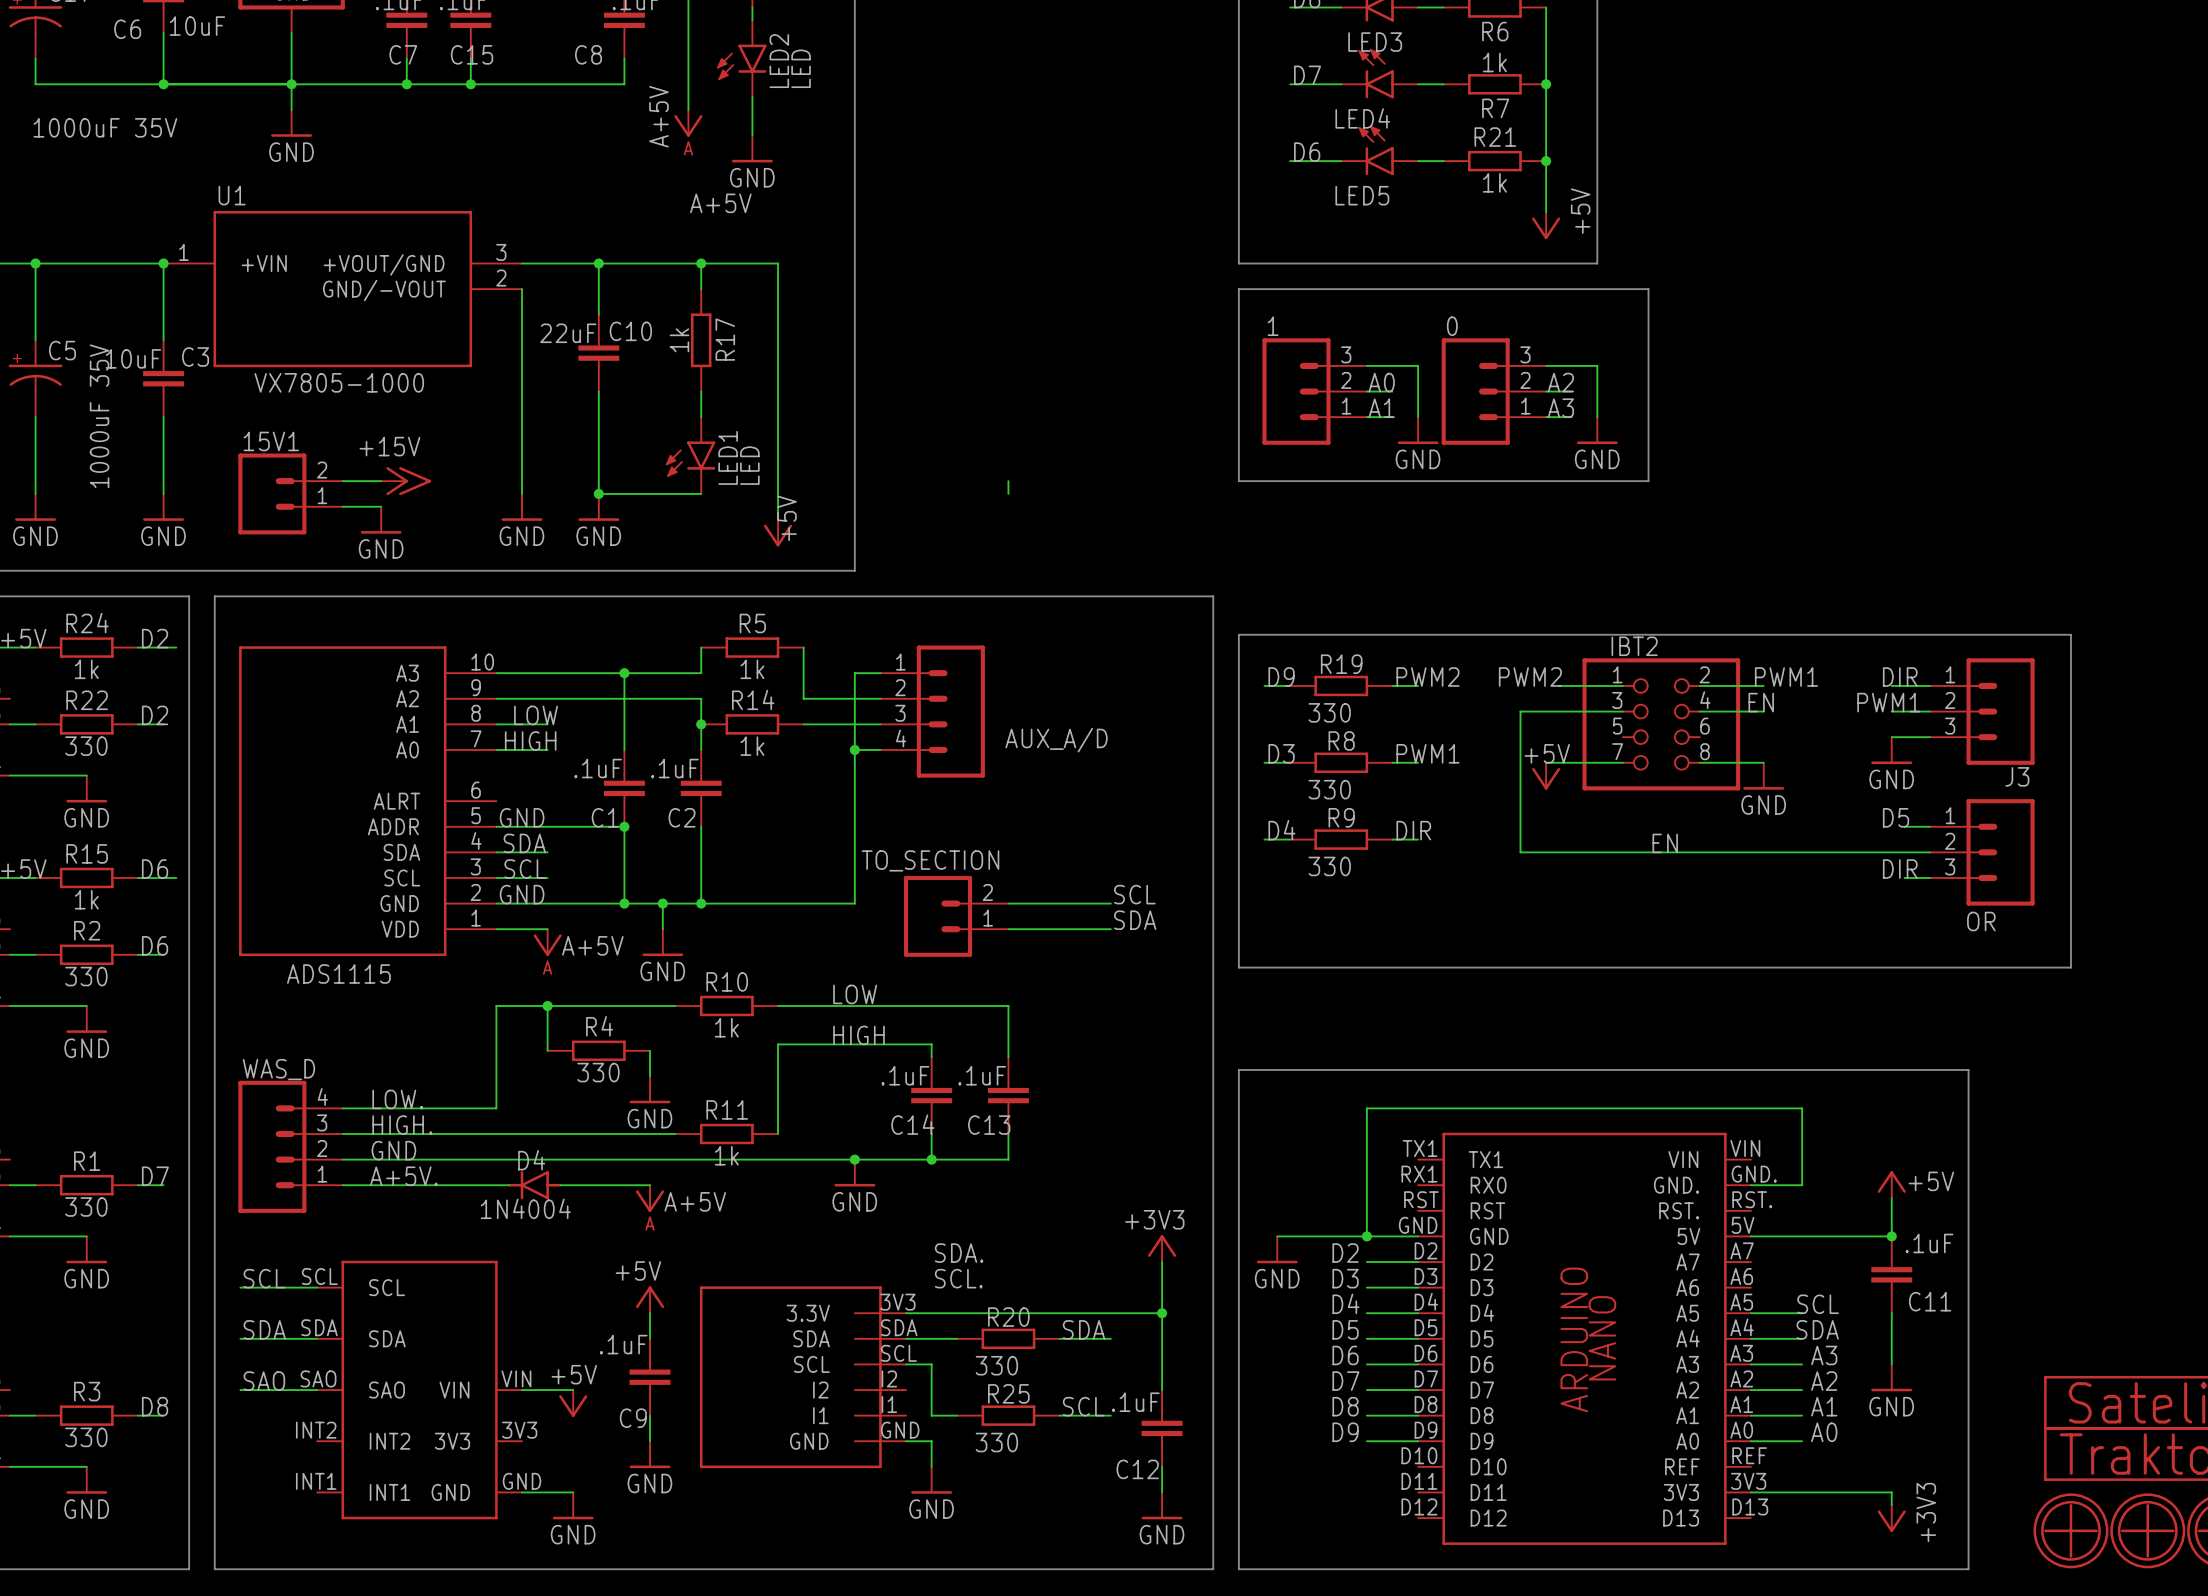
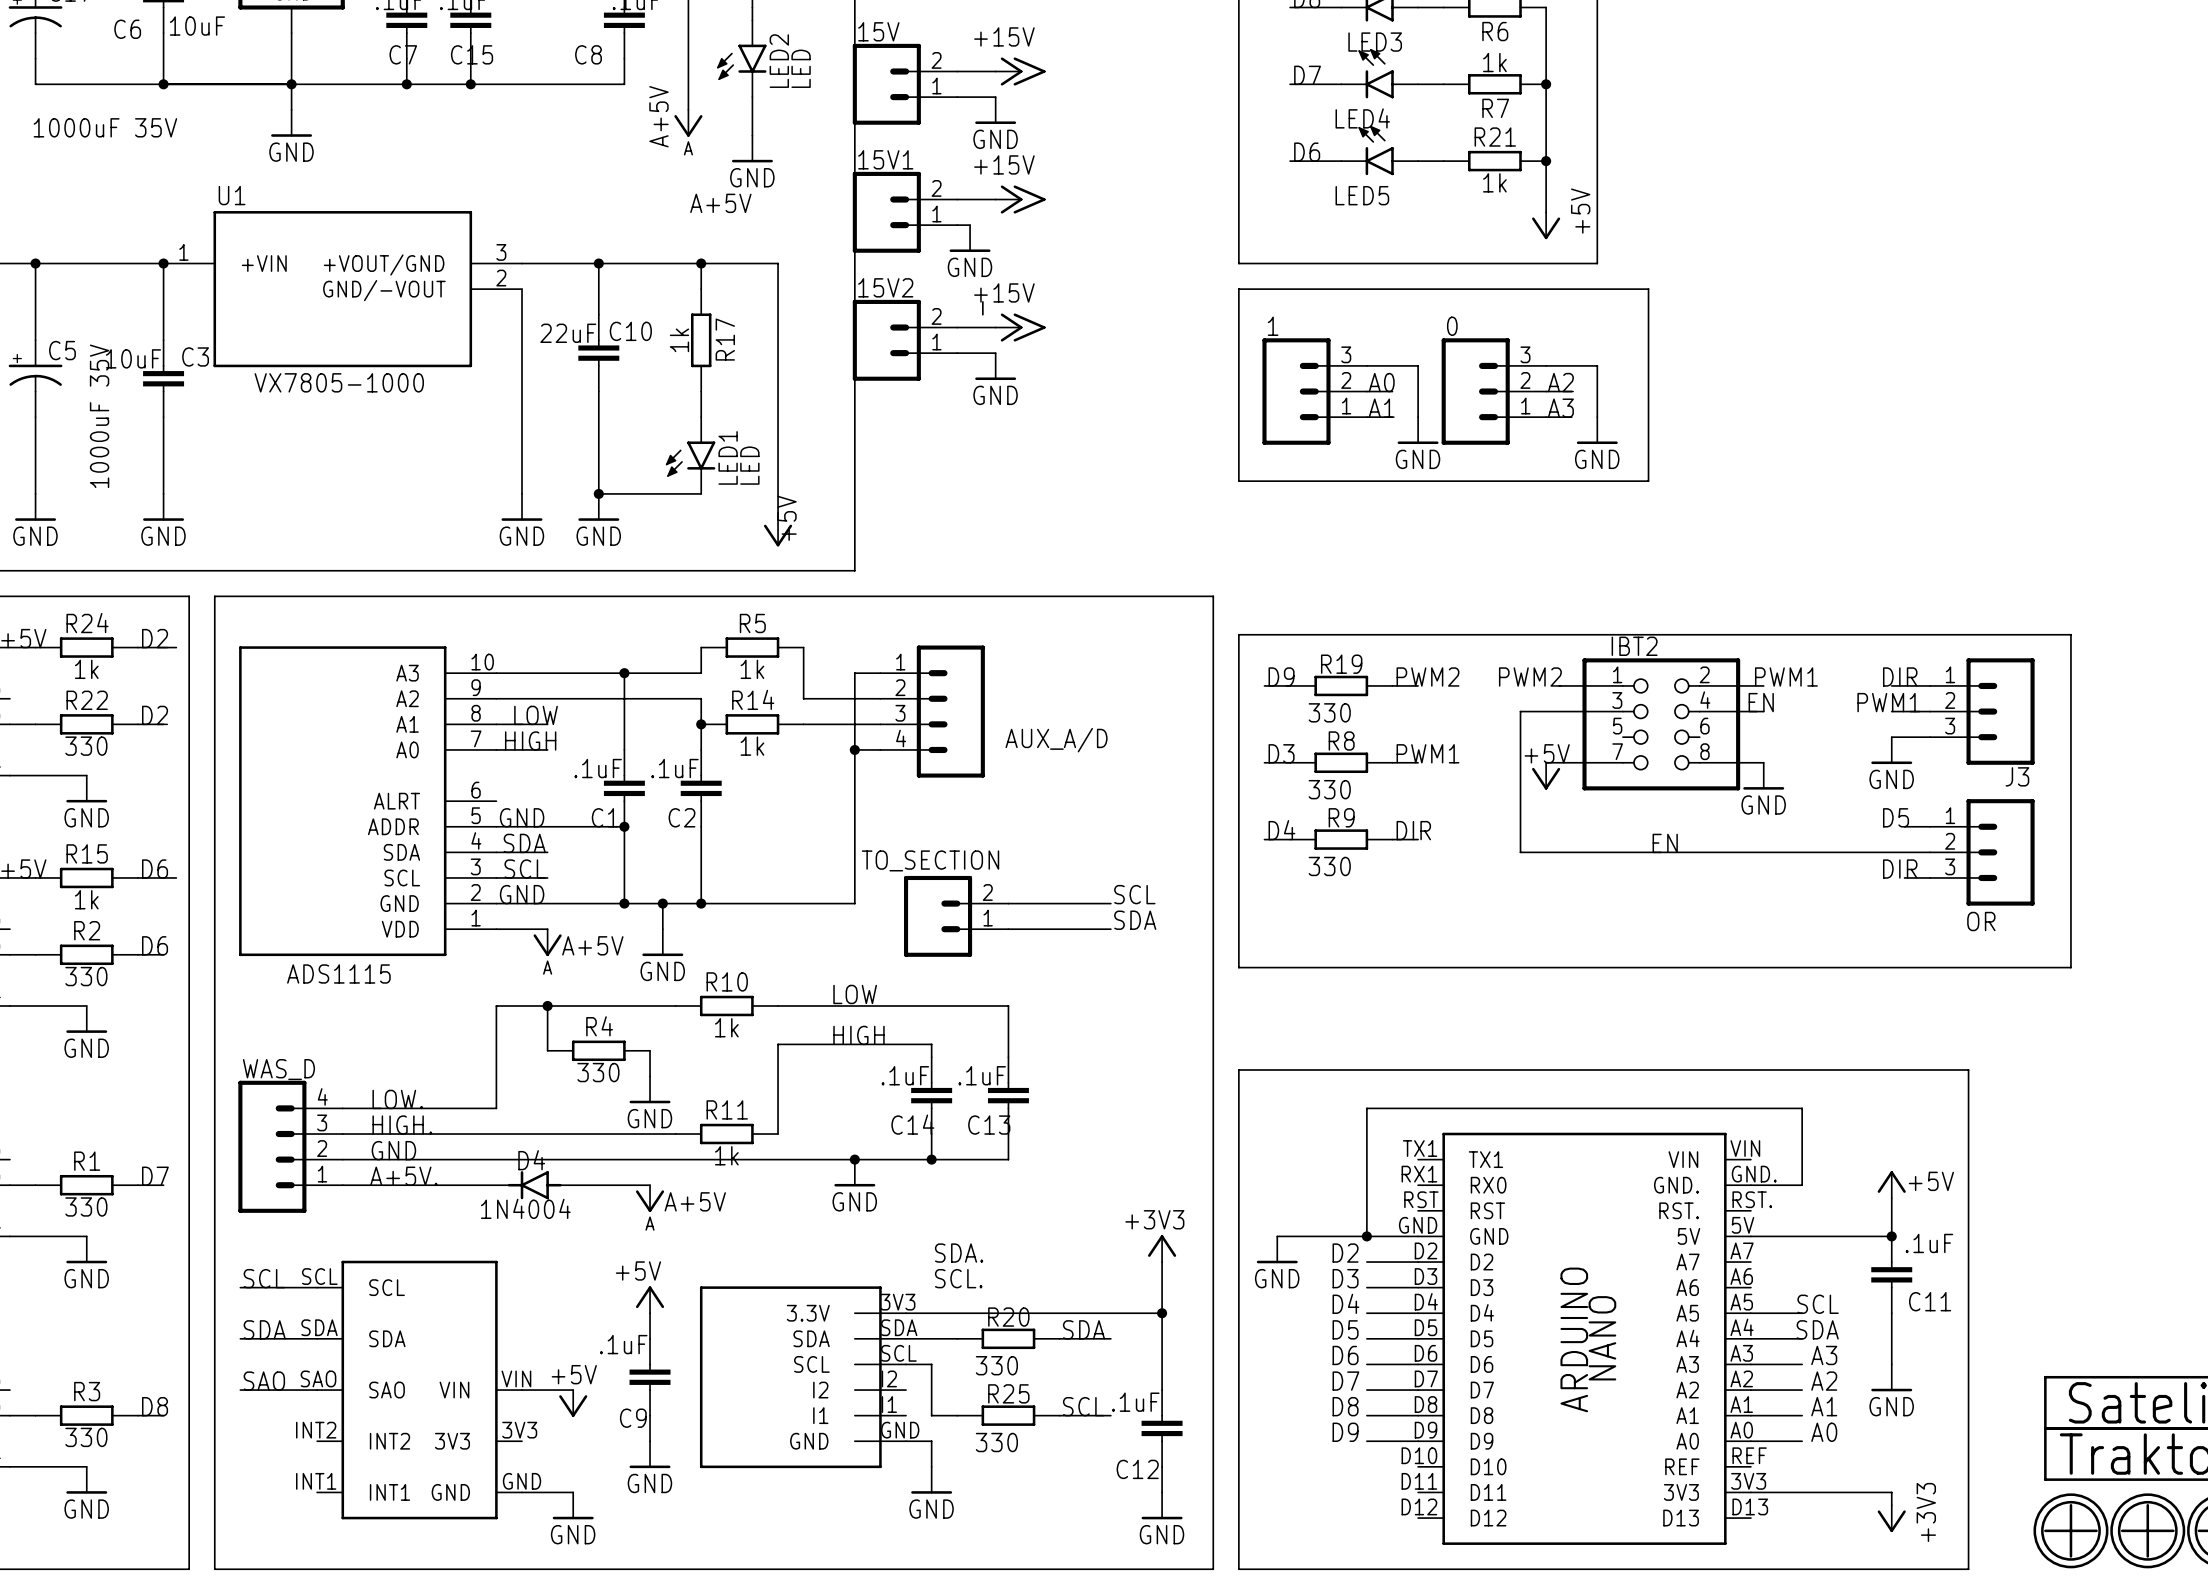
wire: none -> (957, 71) (995, 71)
power symbol: none -> +15V (1020, 71)
15V: none -> (905, 84)
wire: none -> (957, 97) (995, 97)
power symbol: none -> GND (995, 110)
wire: none -> (957, 199) (995, 199)
power symbol: none -> +15V (1020, 199)
wire: none -> (957, 225) (970, 225)
power symbol: none -> GND (970, 238)
wire: none -> (957, 327) (995, 327)
power symbol: none -> +15V (1020, 327)
15V2: none -> (905, 340)
wire: none -> (957, 353) (995, 353)
power symbol: none -> GND (995, 366)
wire: (342, 481) (381, 481) -> none
power symbol: +15V (406, 481) -> none
wire: (1008, 481) (1008, 493) -> (982, 301) (982, 314)
15V1 position: (290, 493) -> (905, 212)
wire: (342, 506) (381, 506) -> none
power symbol: GND (381, 520) -> none

